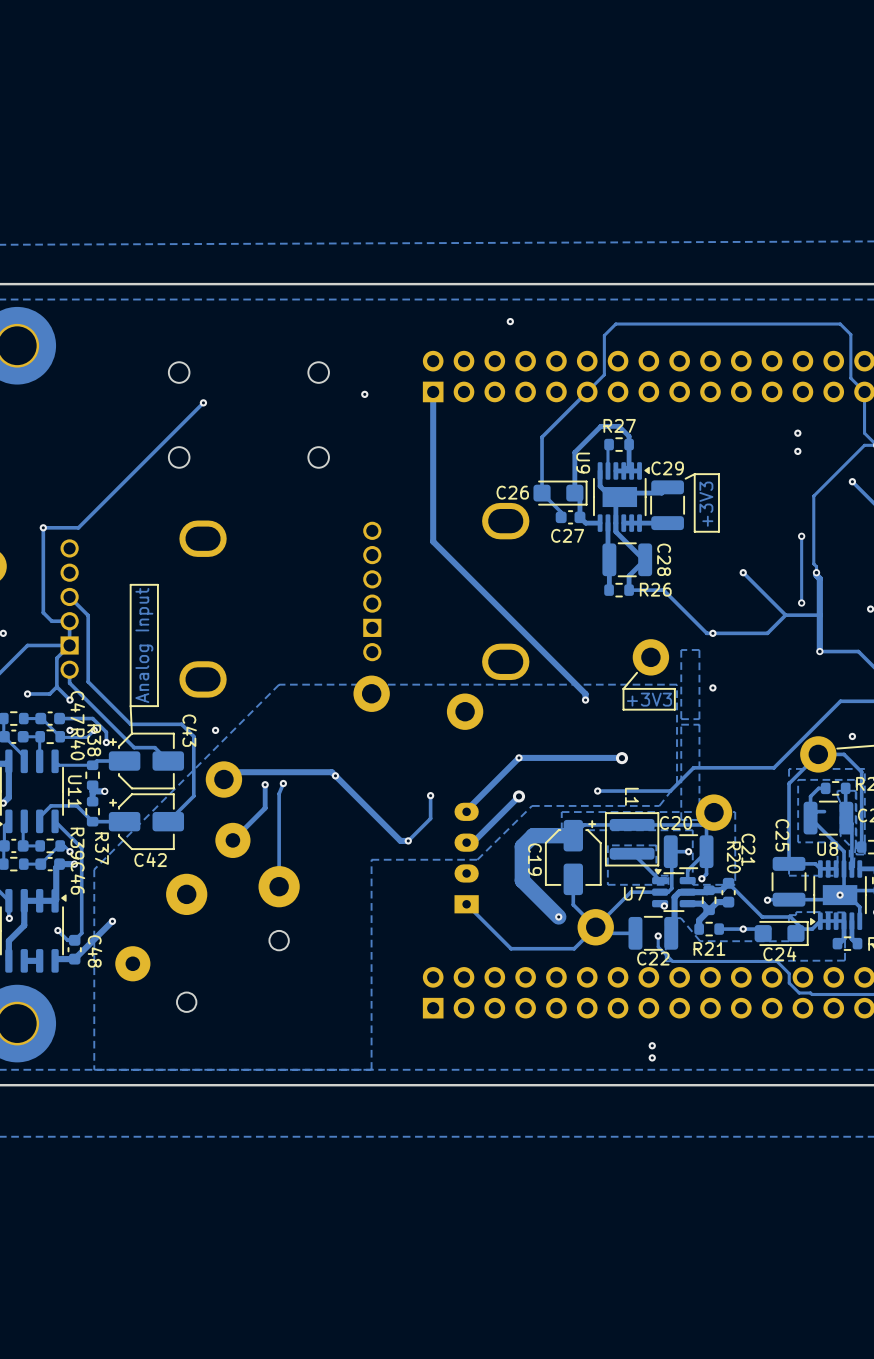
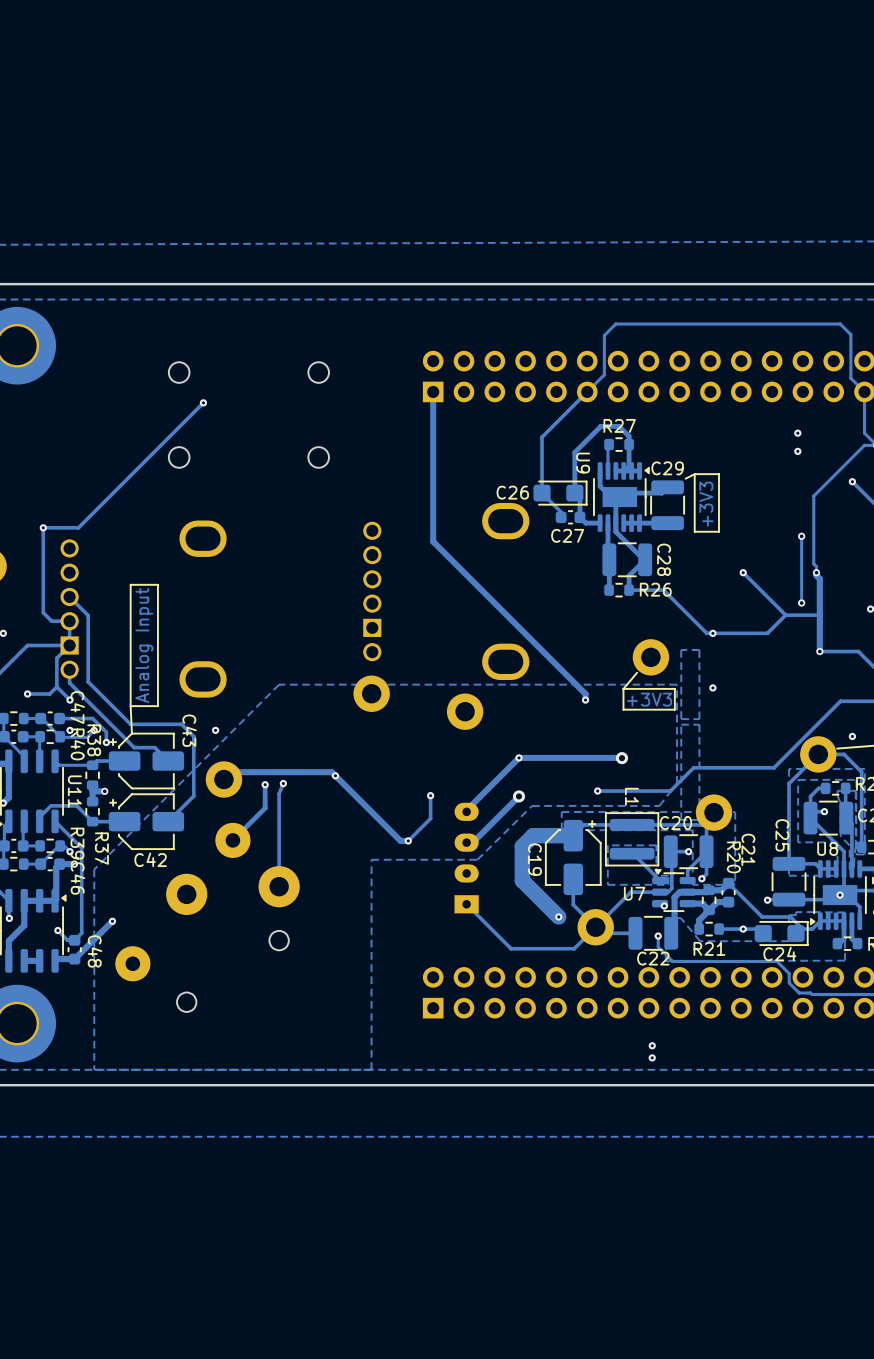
via: (510, 321) -> none
via: (364, 394) -> none
via: none -> (824, 811)

